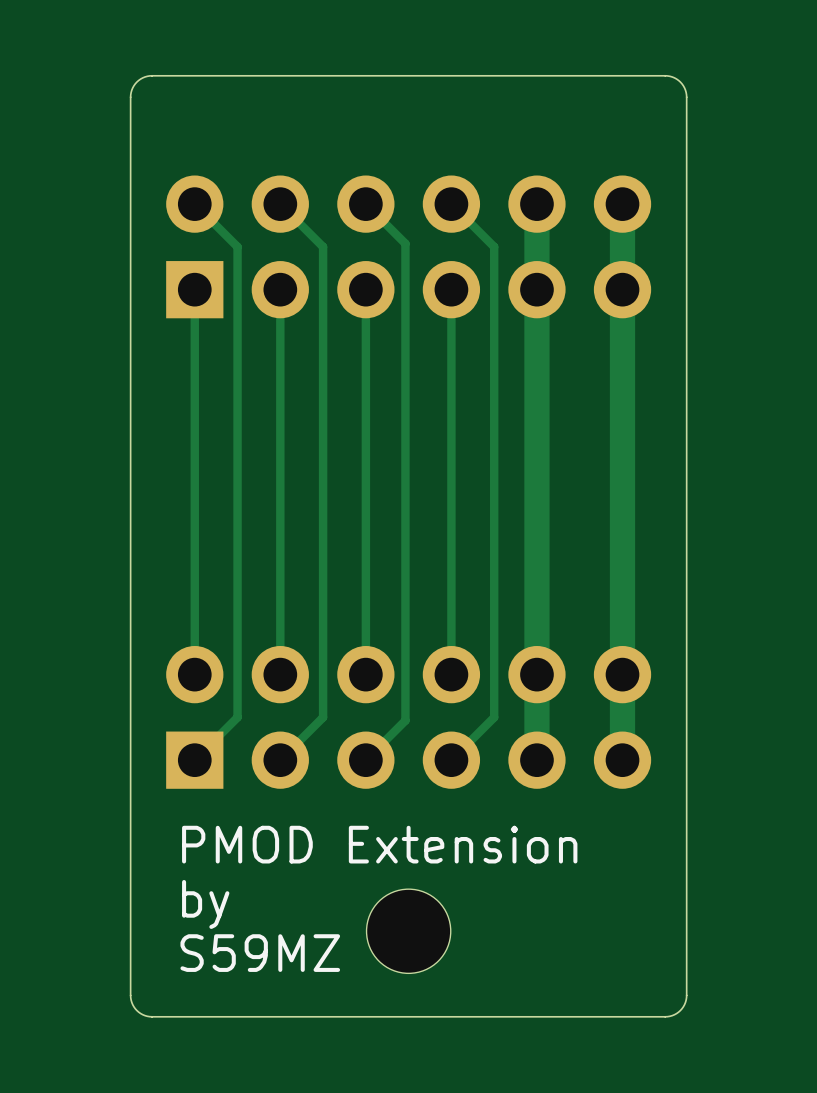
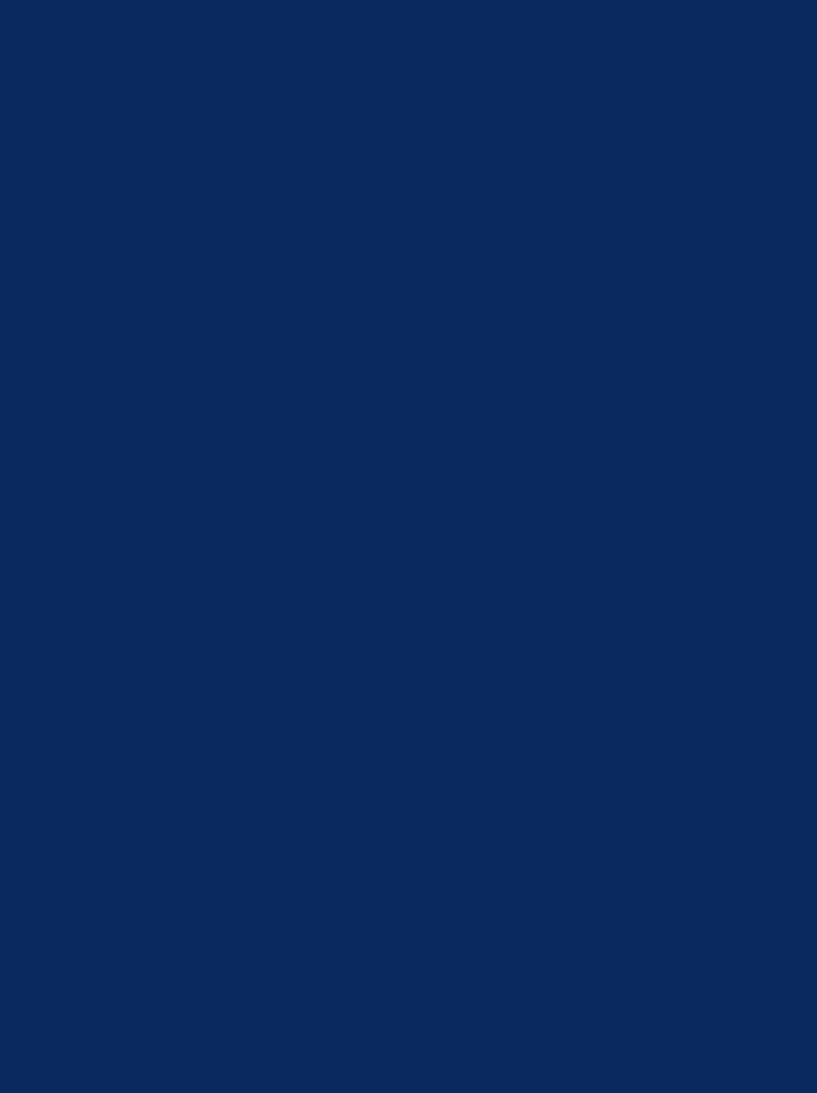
board edge: (665, 75) (152, 75) (140, 79) (133, 85) (130, 97) (130, 995) (132, 1004) (140, 1013) (152, 1016) (665, 1016) (676, 1013) (683, 1006) (686, 995) (686, 97) (684, 87) (680, 82) (674, 77) (665, 75) -> none
track: (194, 204) (237, 246) (237, 717) (194, 760) -> none
track: (280, 204) (323, 246) (323, 717) (280, 760) -> none
track: (365, 204) (405, 243) (405, 720) (365, 760) -> none
track: (451, 204) (494, 246) (494, 717) (451, 760) -> none
track: (536, 204) (536, 760) -> none
track: (622, 204) (622, 760) -> none
part: (408, 246) -> none
track: (194, 289) (194, 674) -> none
track: (280, 289) (280, 674) -> none
track: (365, 289) (365, 674) -> none
track: (451, 289) (451, 674) -> none
part: (408, 717) -> none
text: PMOD Extension (379, 844) -> none
text: by (205, 904) -> none
part: (408, 931) -> none
text: S59MZ (260, 953) -> none

